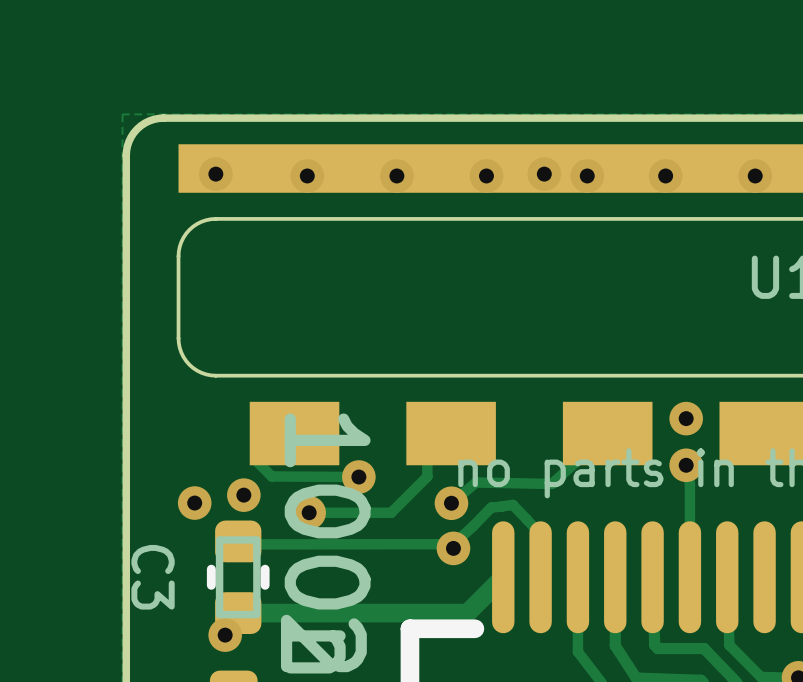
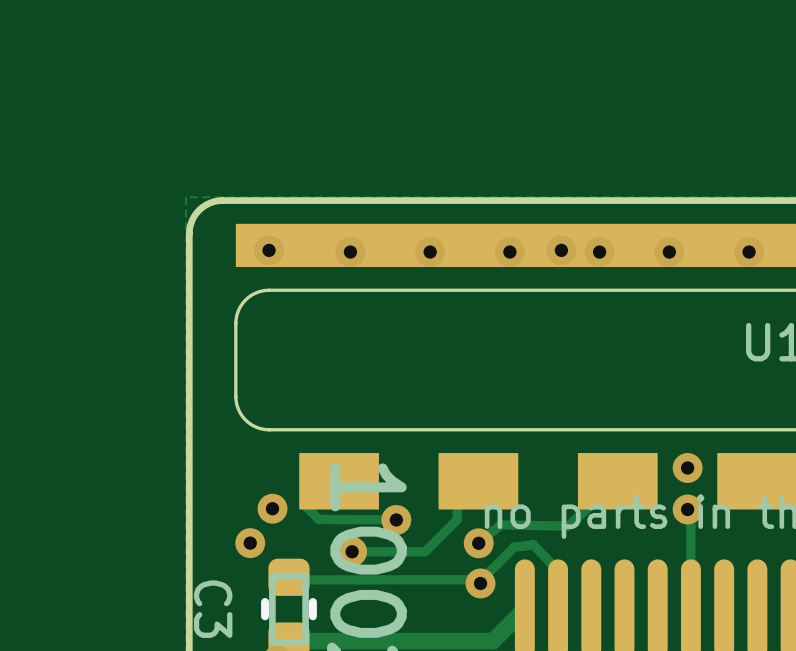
via position: (243, 495) -> (272, 508)

